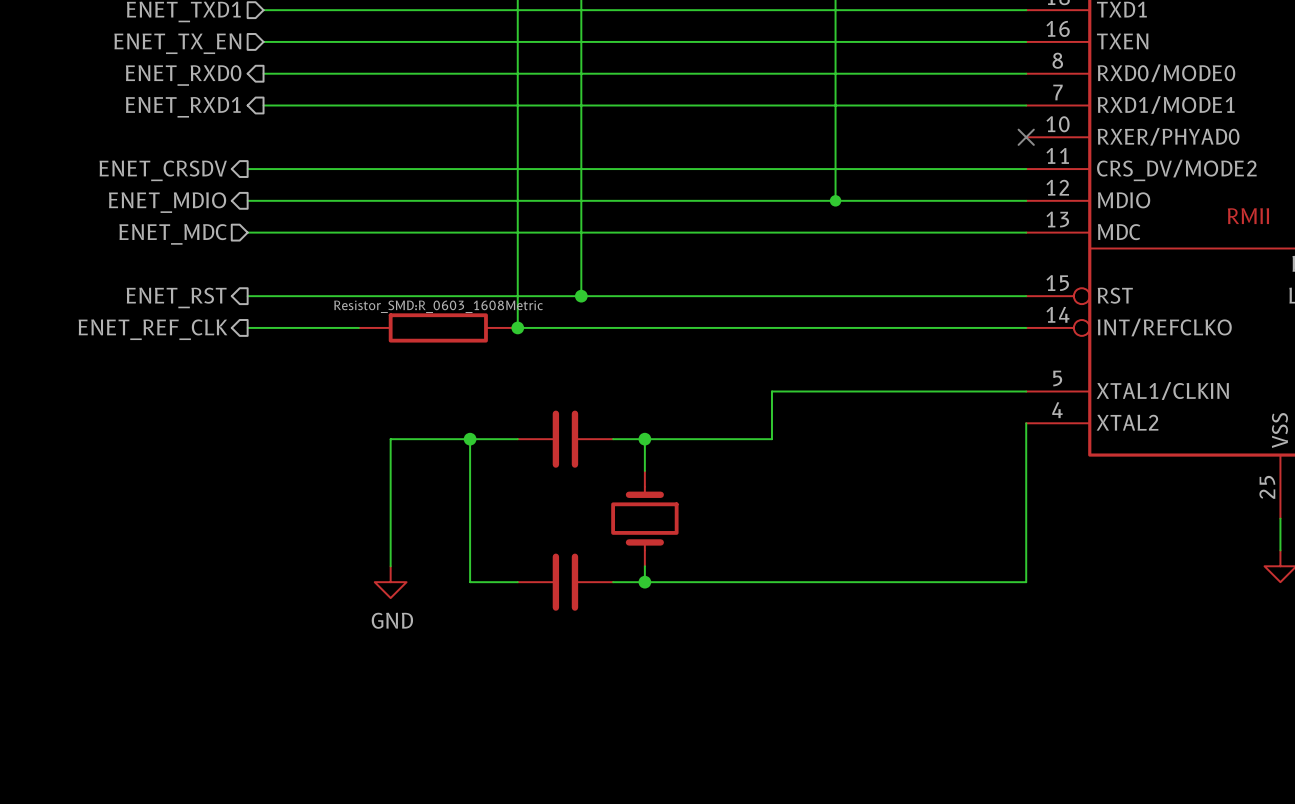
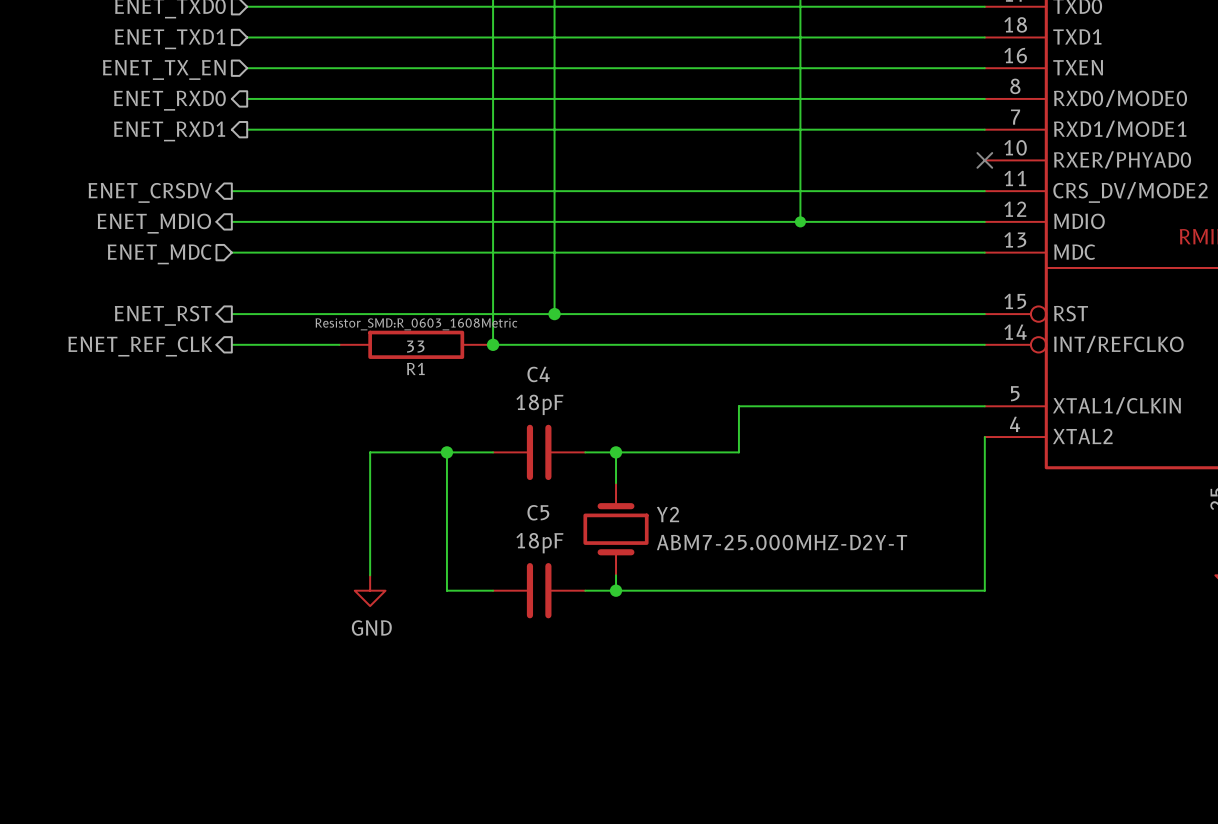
R1 value: none -> 33 (415, 346)
R1 name: none -> R1 (415, 368)
C4 name: none -> C4 (538, 374)
C4 value: none -> 18pF (539, 404)
C5 name: none -> C5 (538, 512)
Y2 name: none -> Y2 (667, 514)
Y2 value: none -> ABM7-25.000MHZ-D2Y-T (782, 542)
C5 value: none -> 18pF (539, 543)

